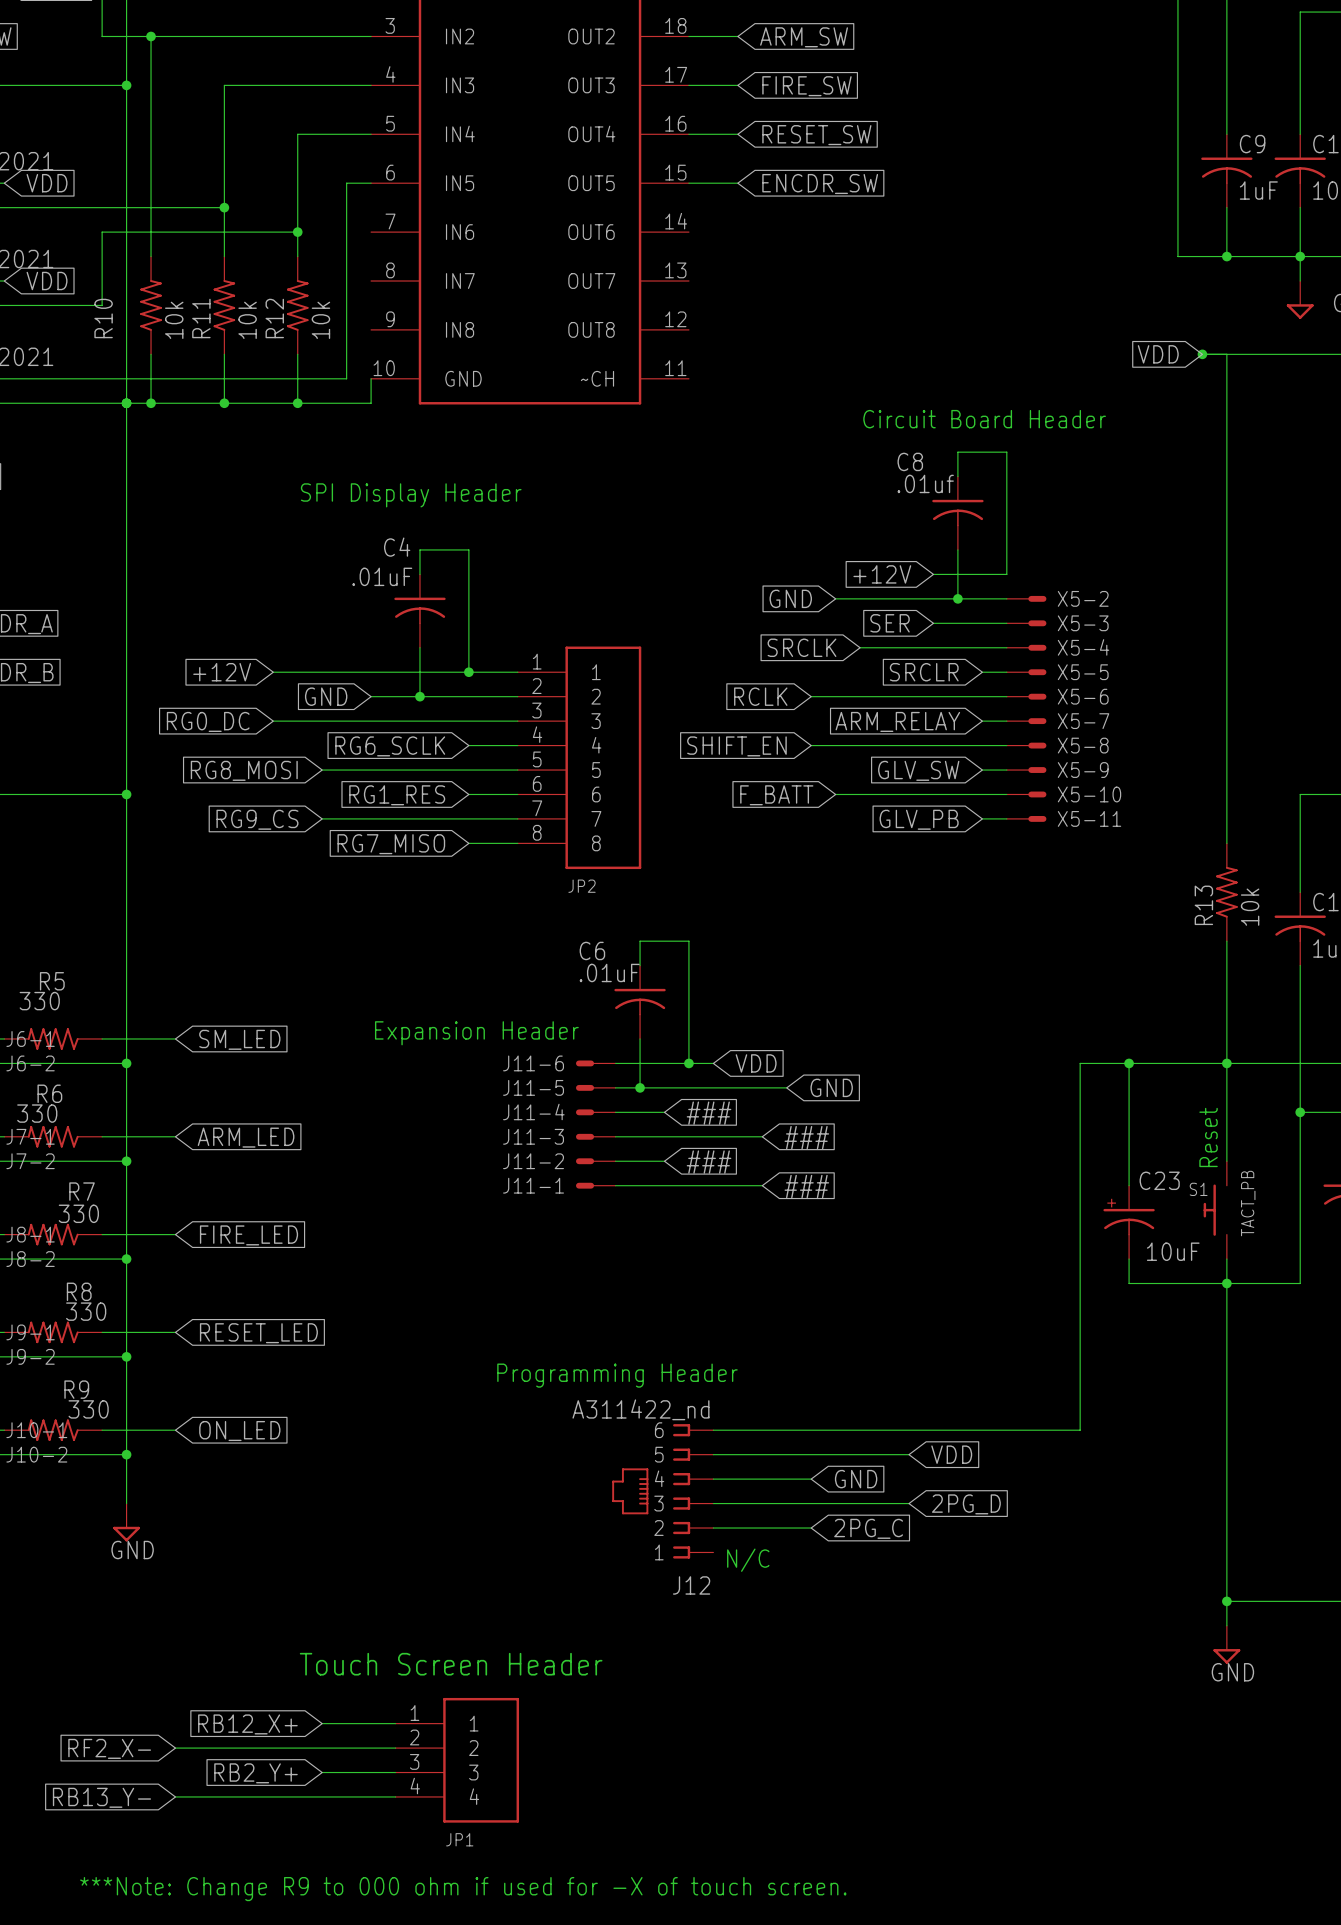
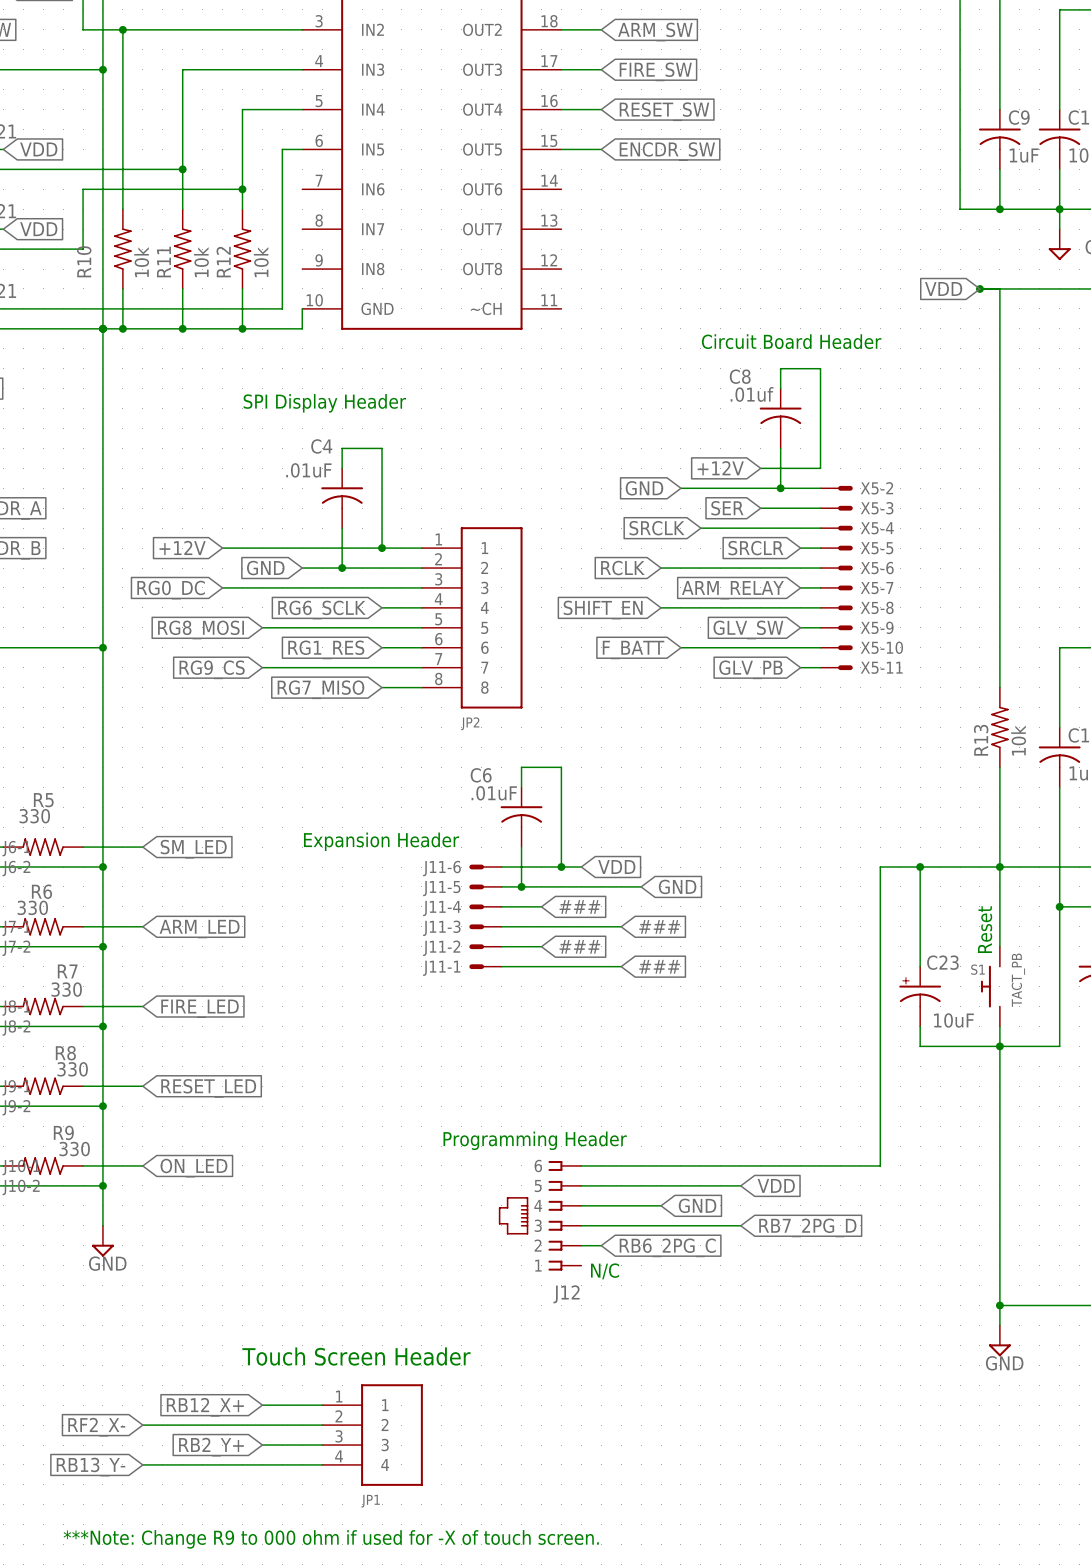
text position: Programming Header (617, 1375) -> Programming Header (535, 1140)
J12 value: A311422_nd (640, 1409) -> none
global label: 2PG_D (966, 1504) -> RB7_2PG_D (807, 1227)
wire: (737, 1528) (811, 1528) -> none
global label: 2PG_C (868, 1528) -> RB6_2PG_C (667, 1247)

